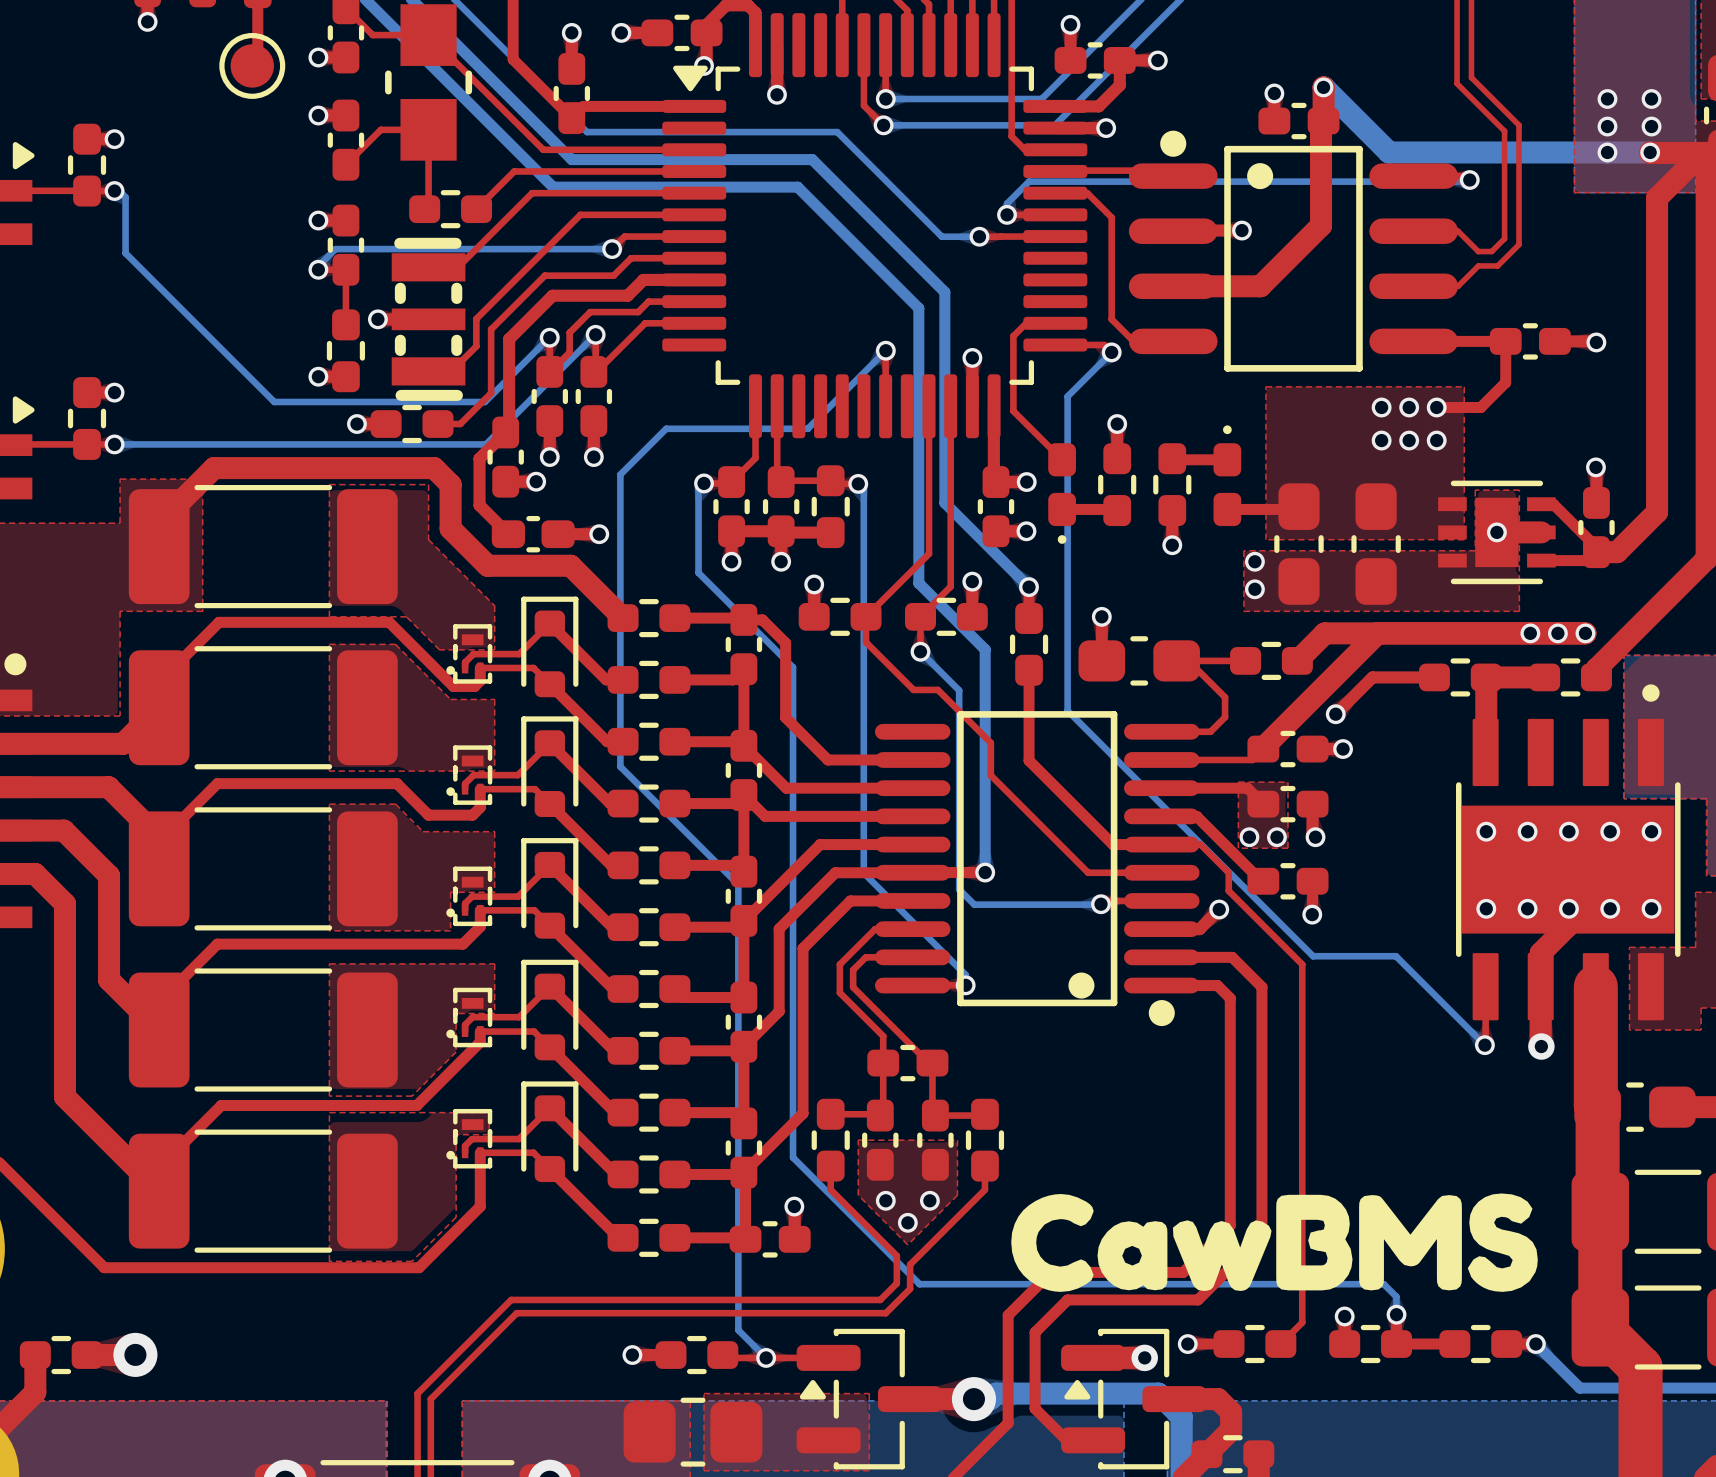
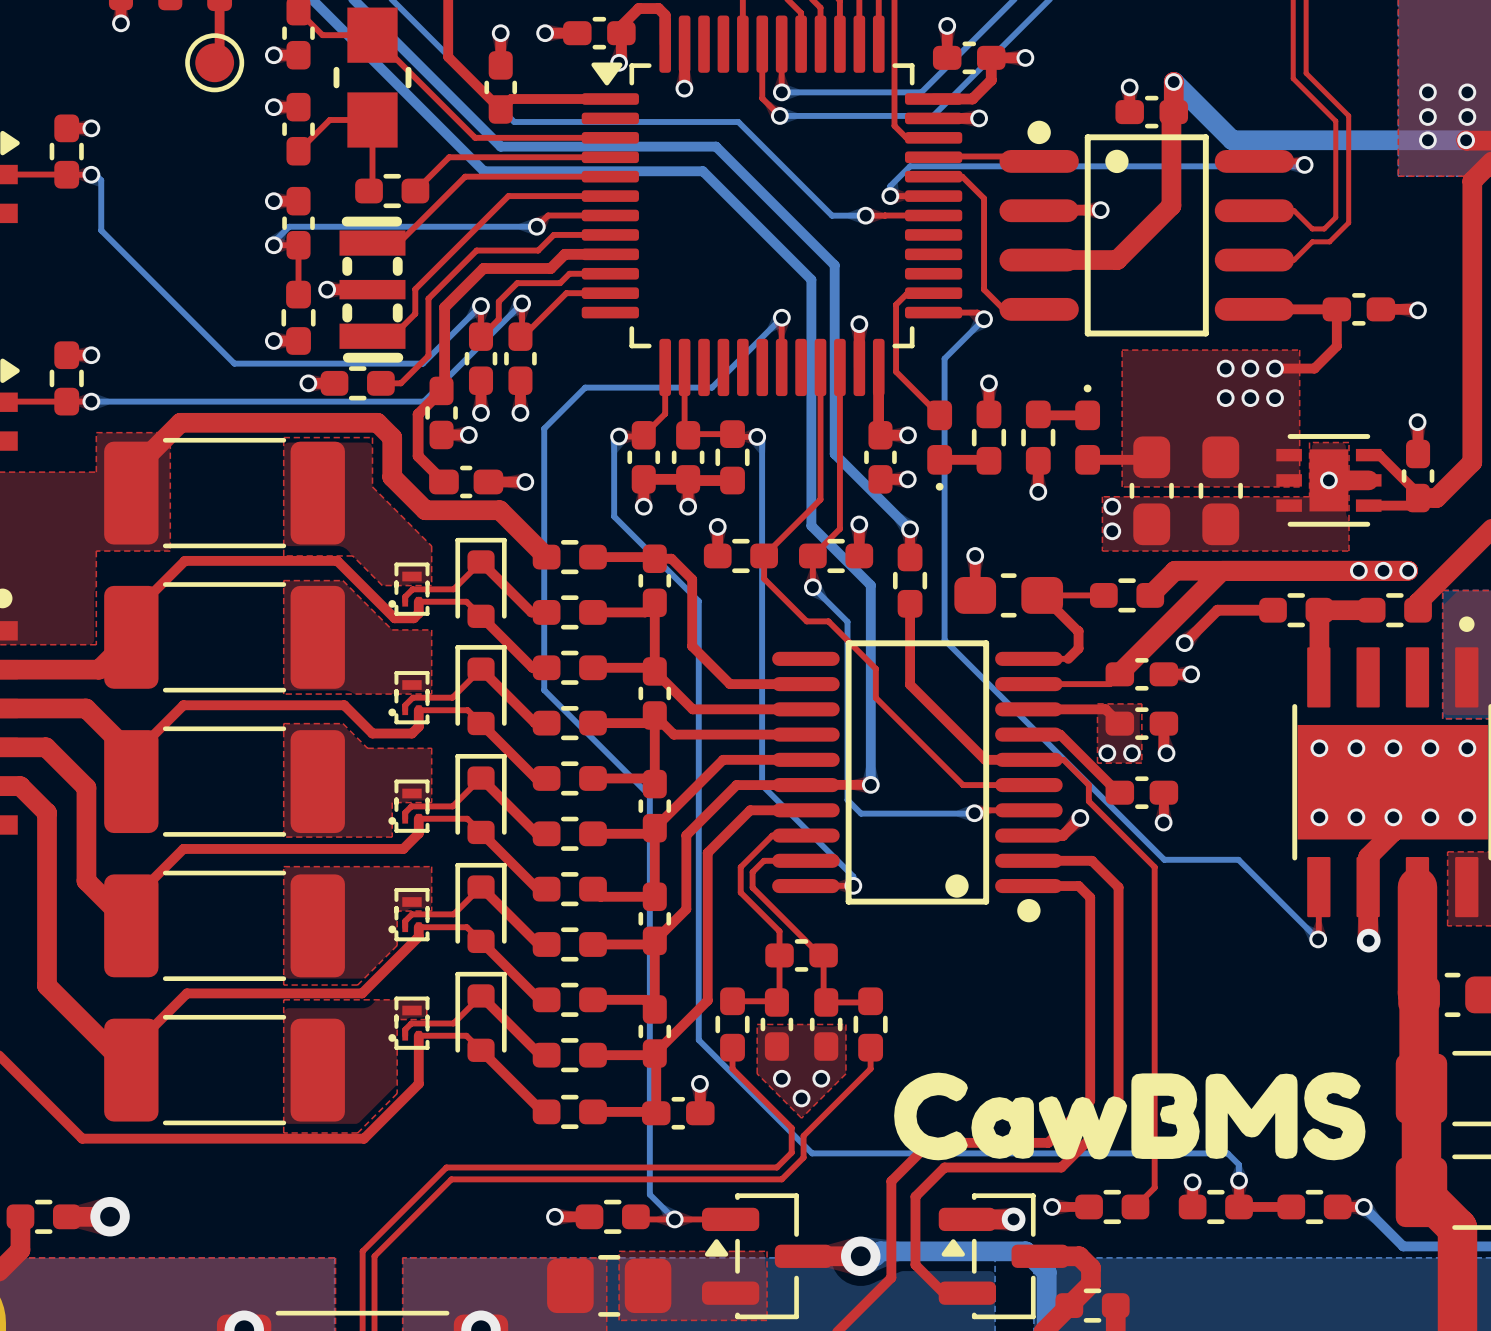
top track: none -> (1042, 595) (1077, 631)
top track: (1188, 660) (1225, 697) (1225, 717) (1210, 731) (1205, 731) -> (1078, 631) (1078, 648) (1068, 658)

